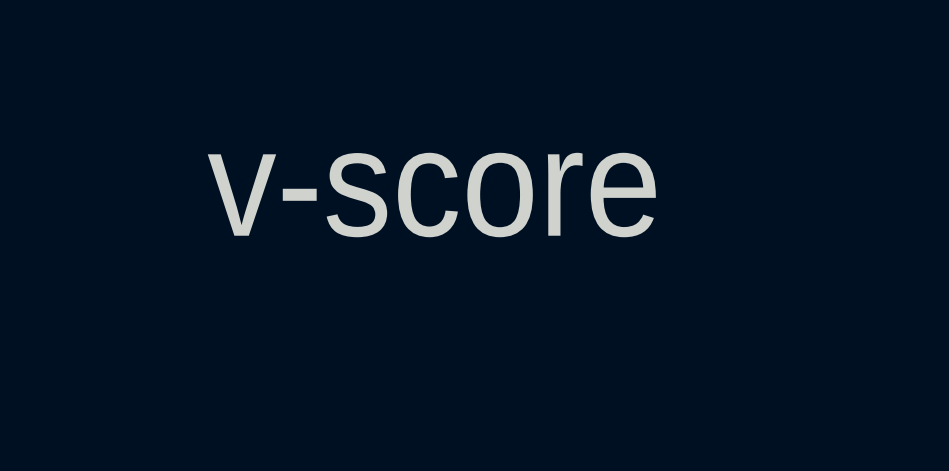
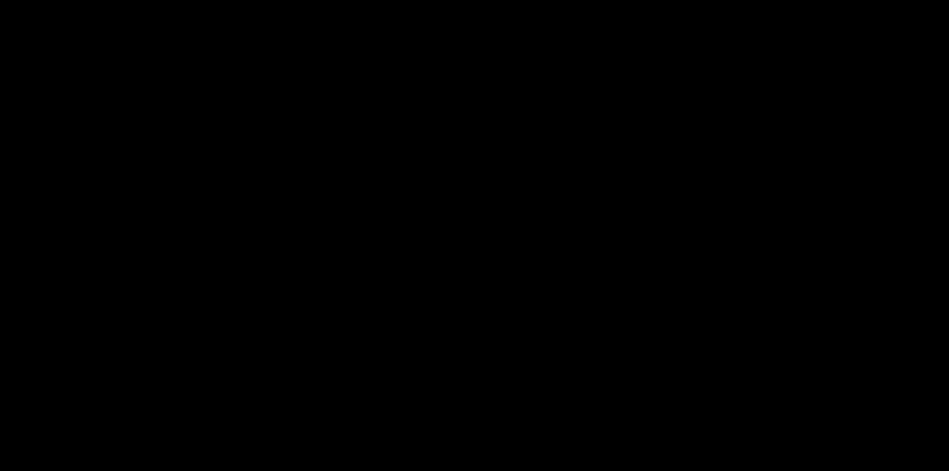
text: v-score (431, 195) -> none

